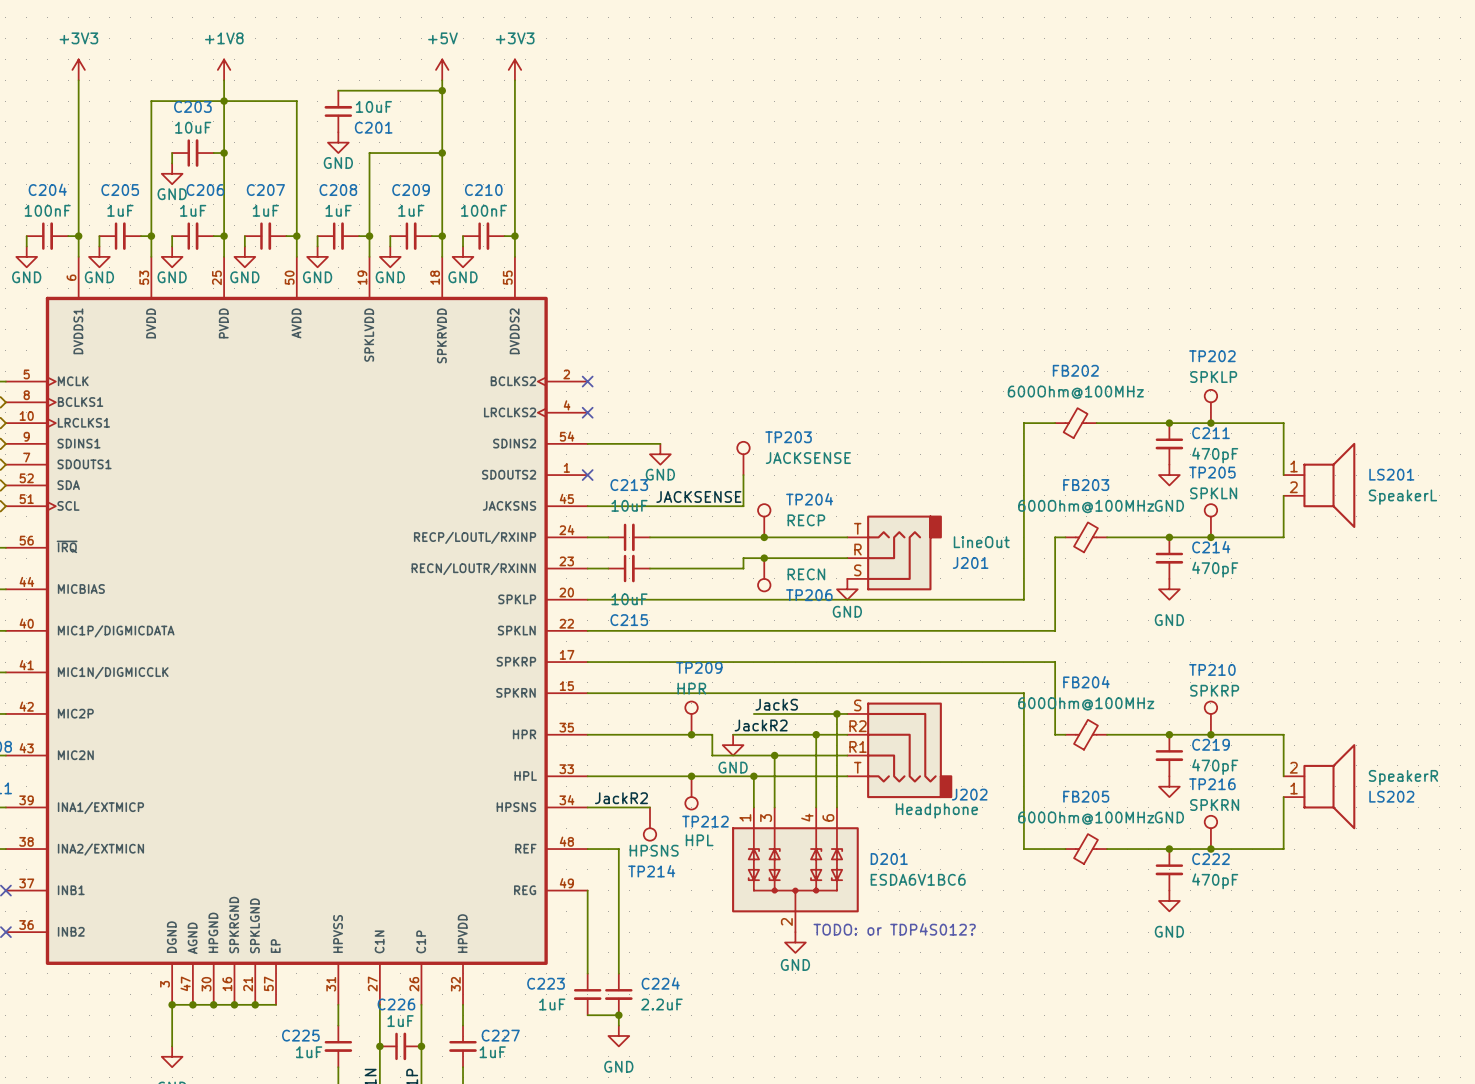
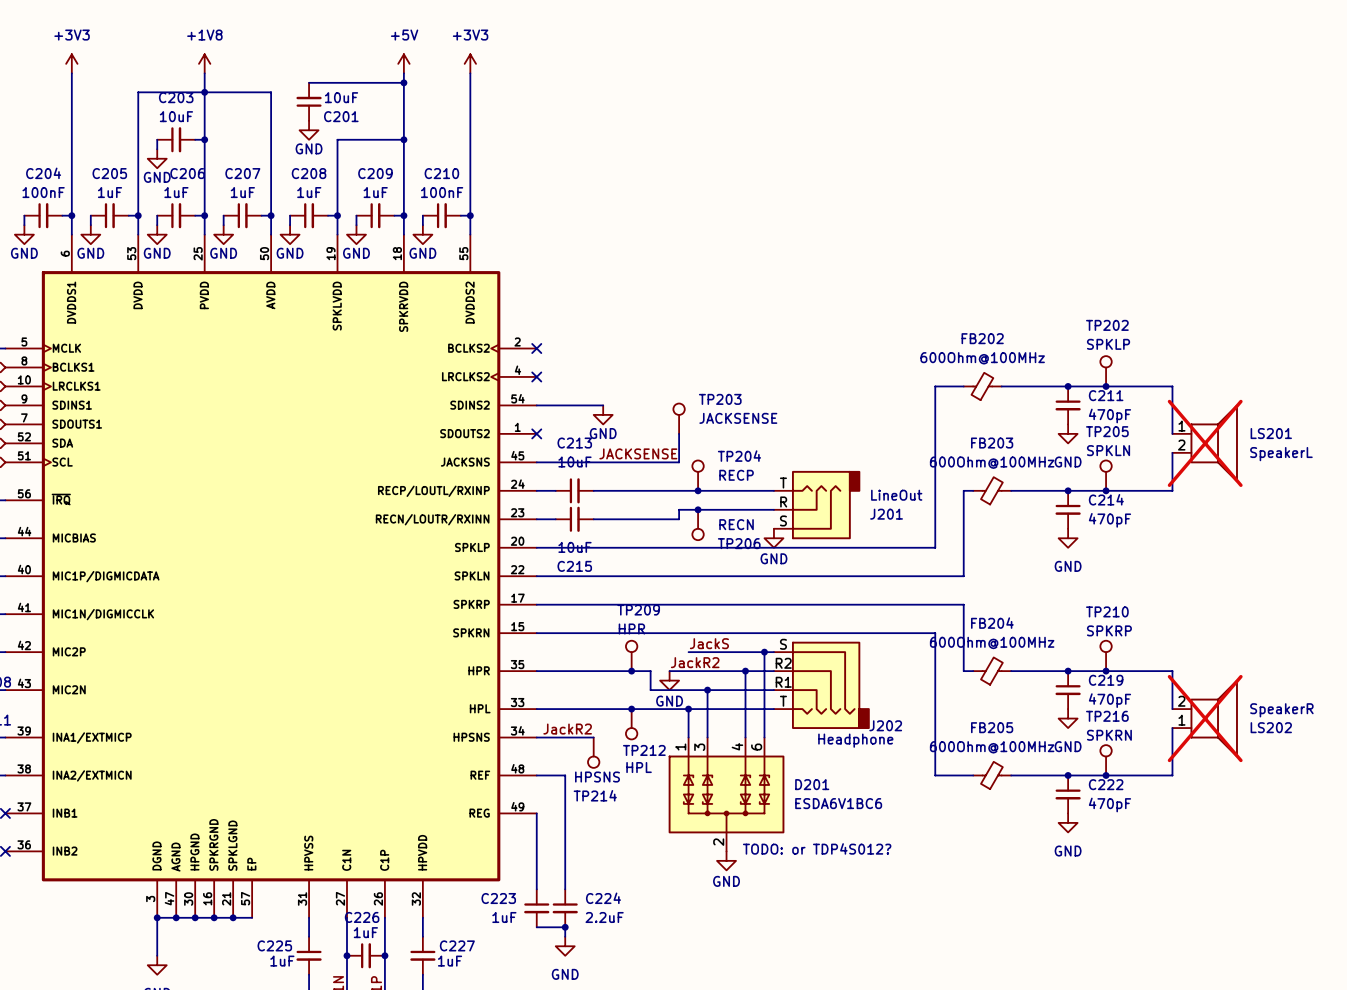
LS201 do-not-place cross: none -> (1205, 443)
LS202 do-not-place cross: none -> (1205, 718)

